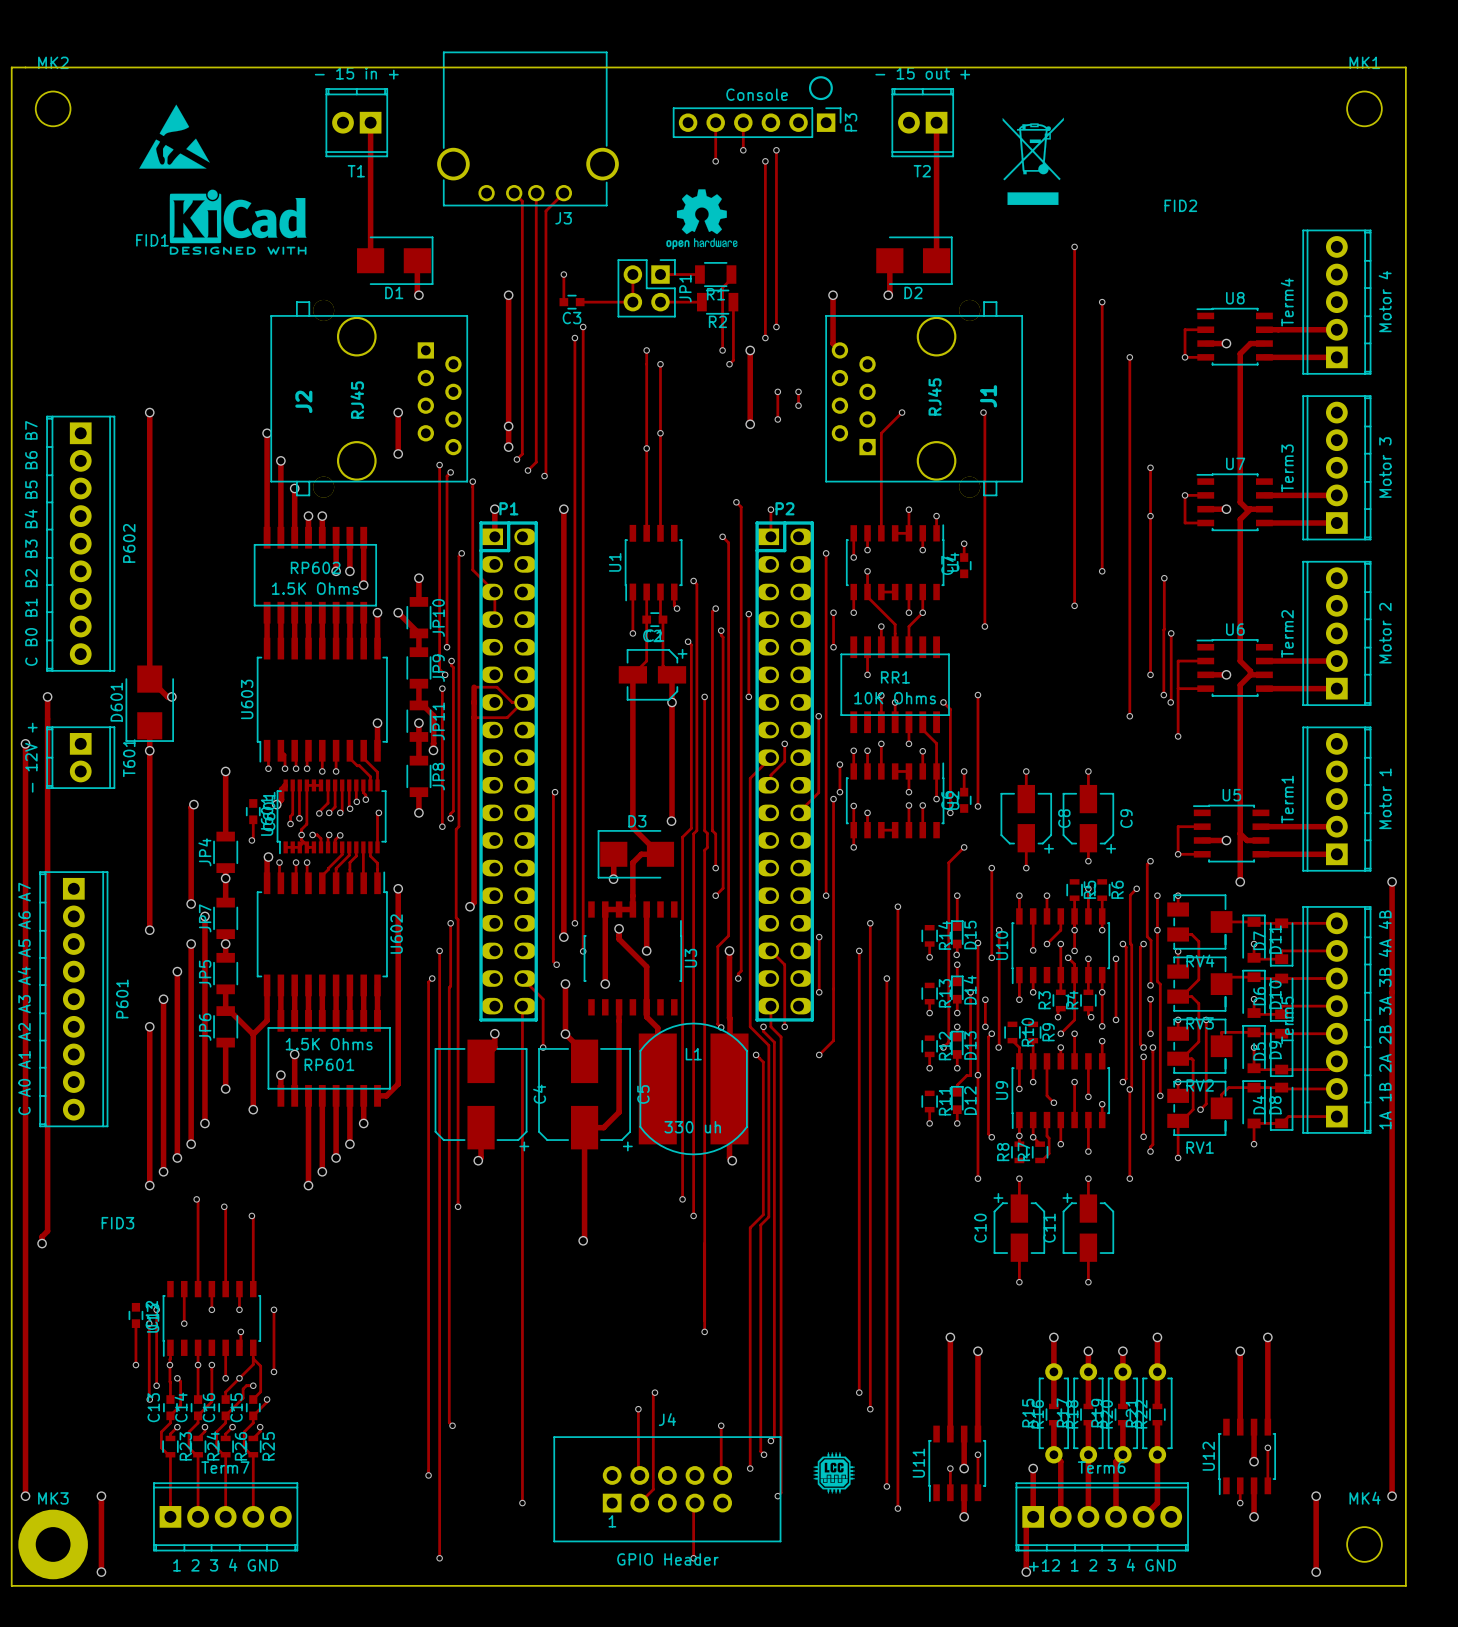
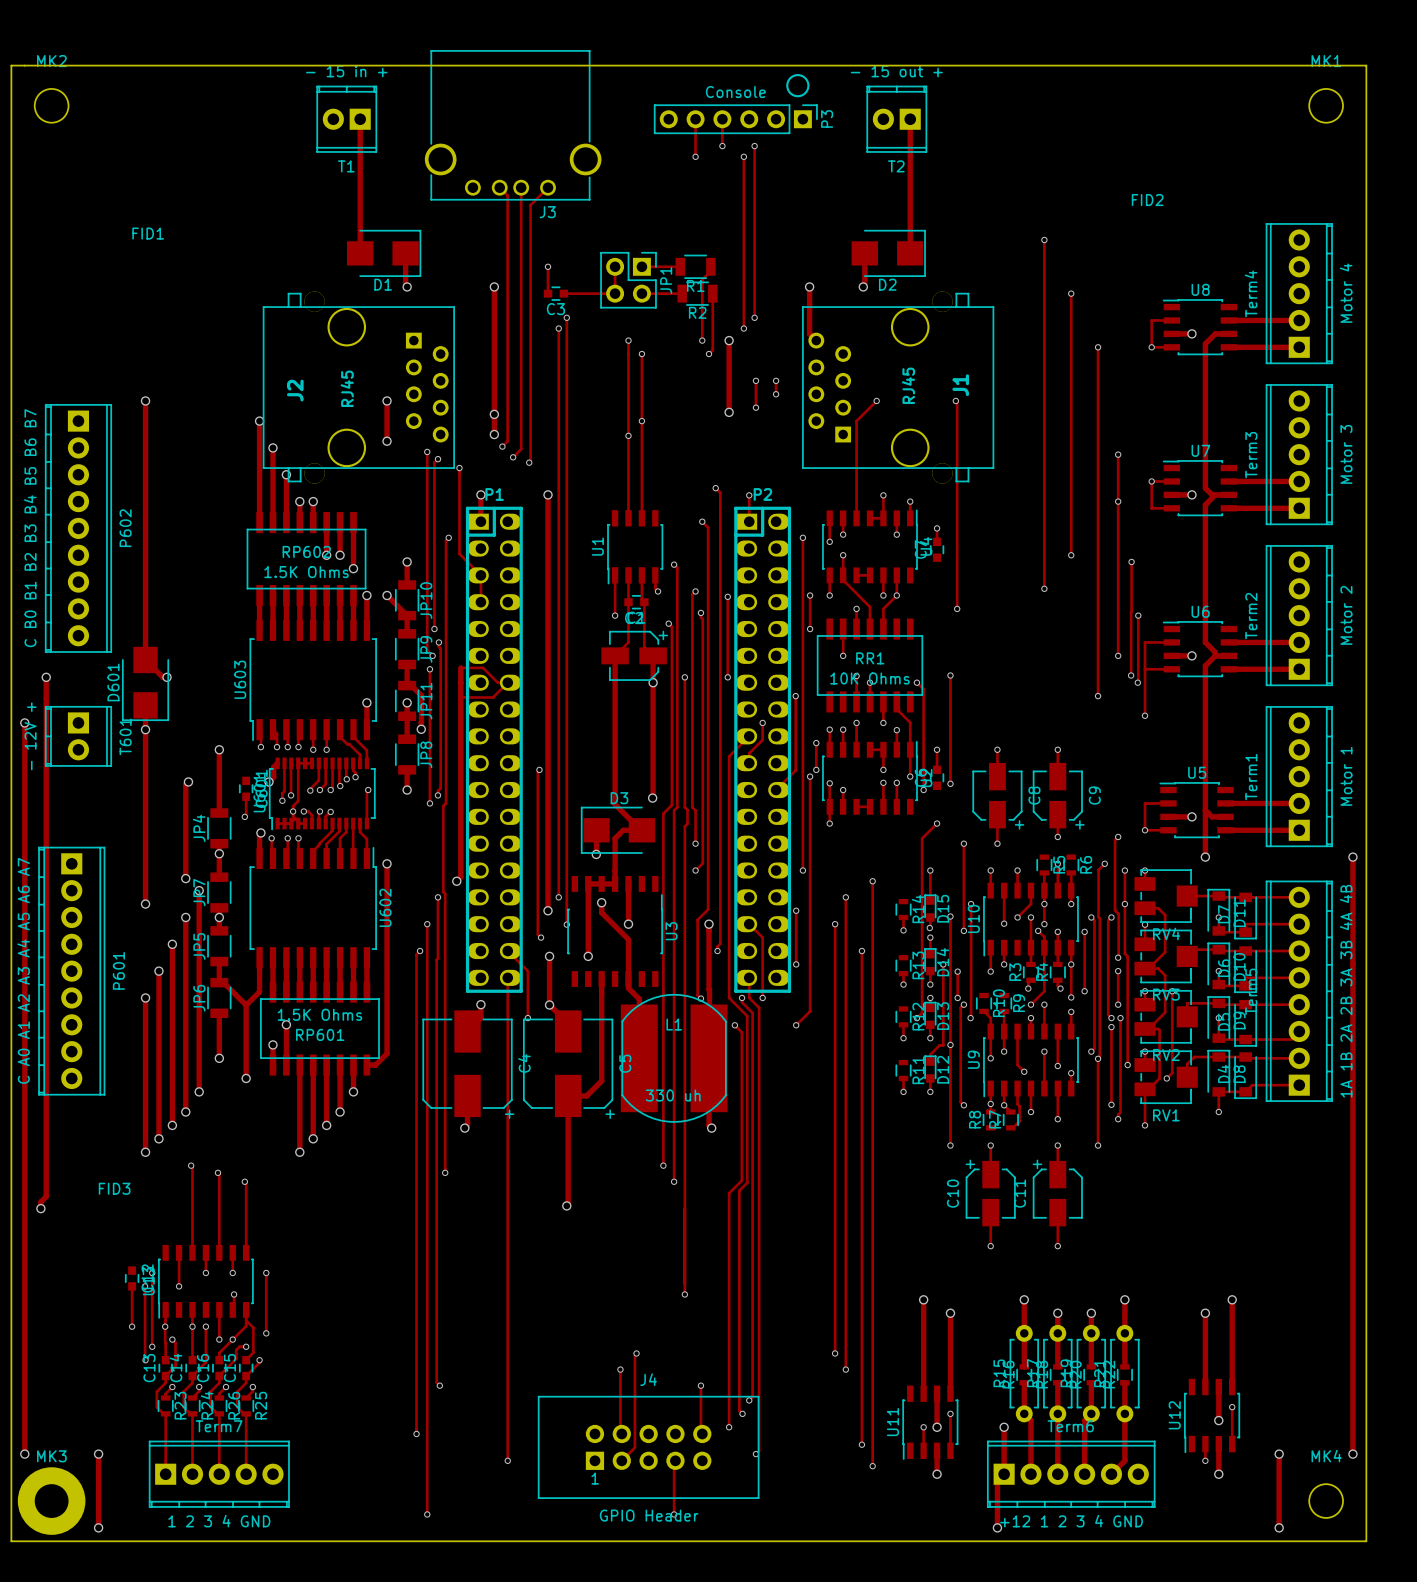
drawing: [139, 104, 210, 169] -> none
drawing: [1002, 117, 1064, 205] -> none
drawing: [169, 189, 307, 255] -> none
drawing: [666, 189, 738, 250] -> none
drawing: [813, 1452, 855, 1494] -> none

